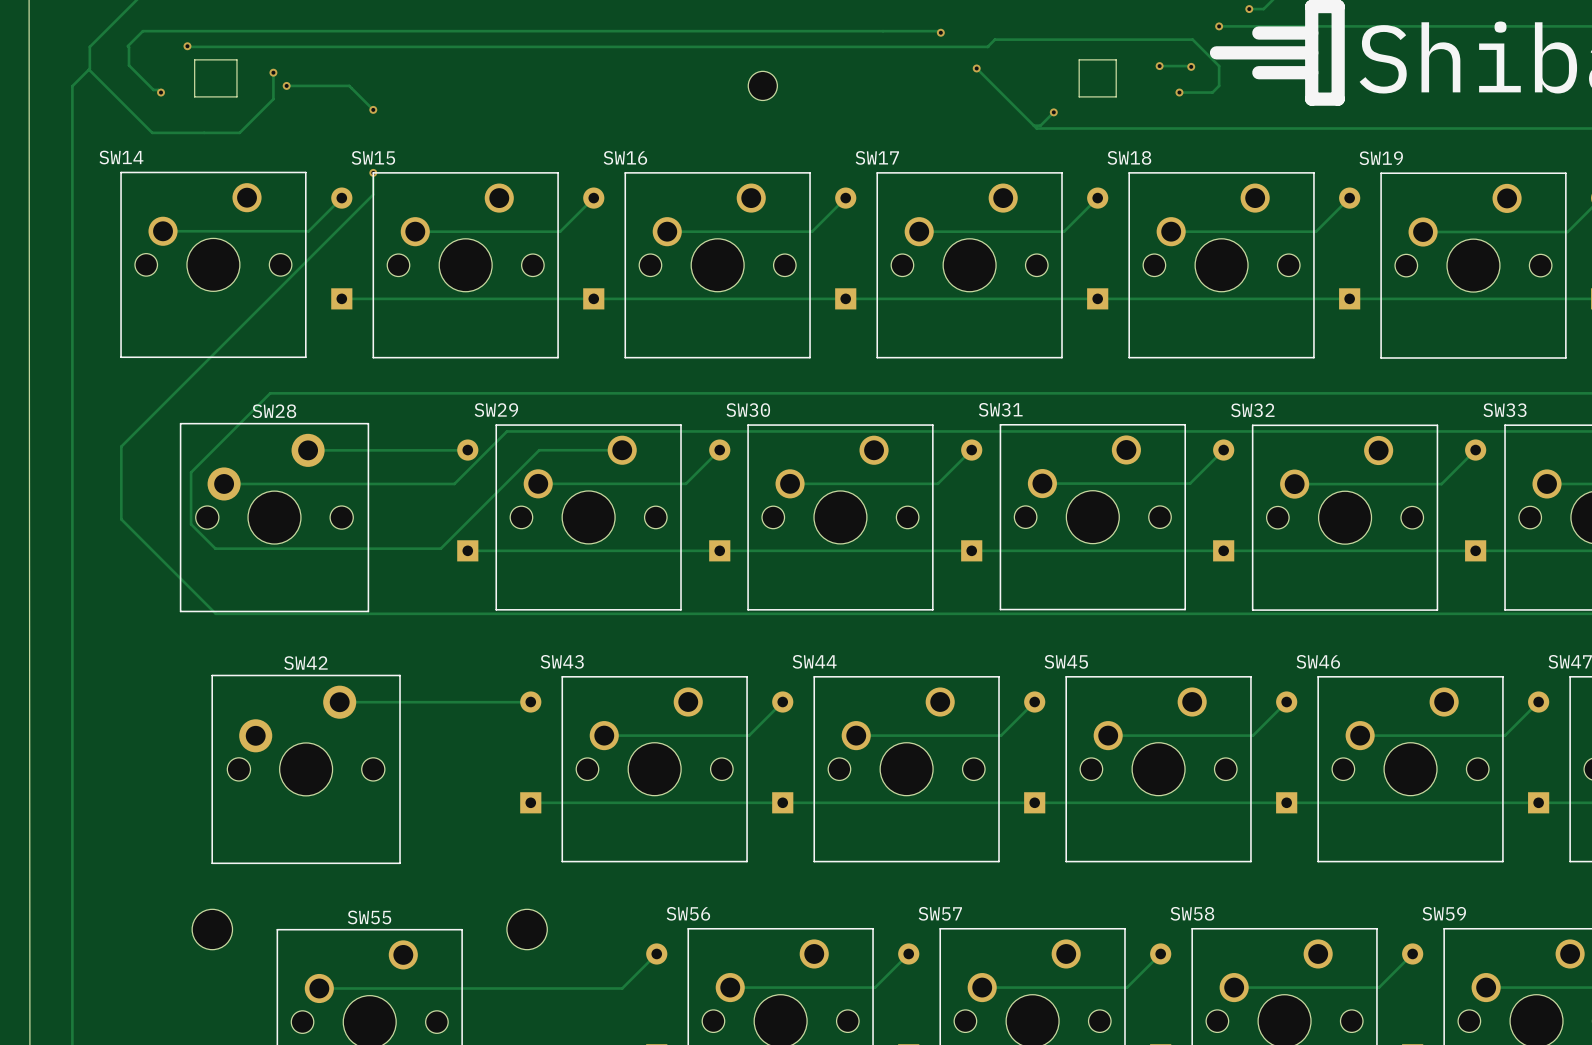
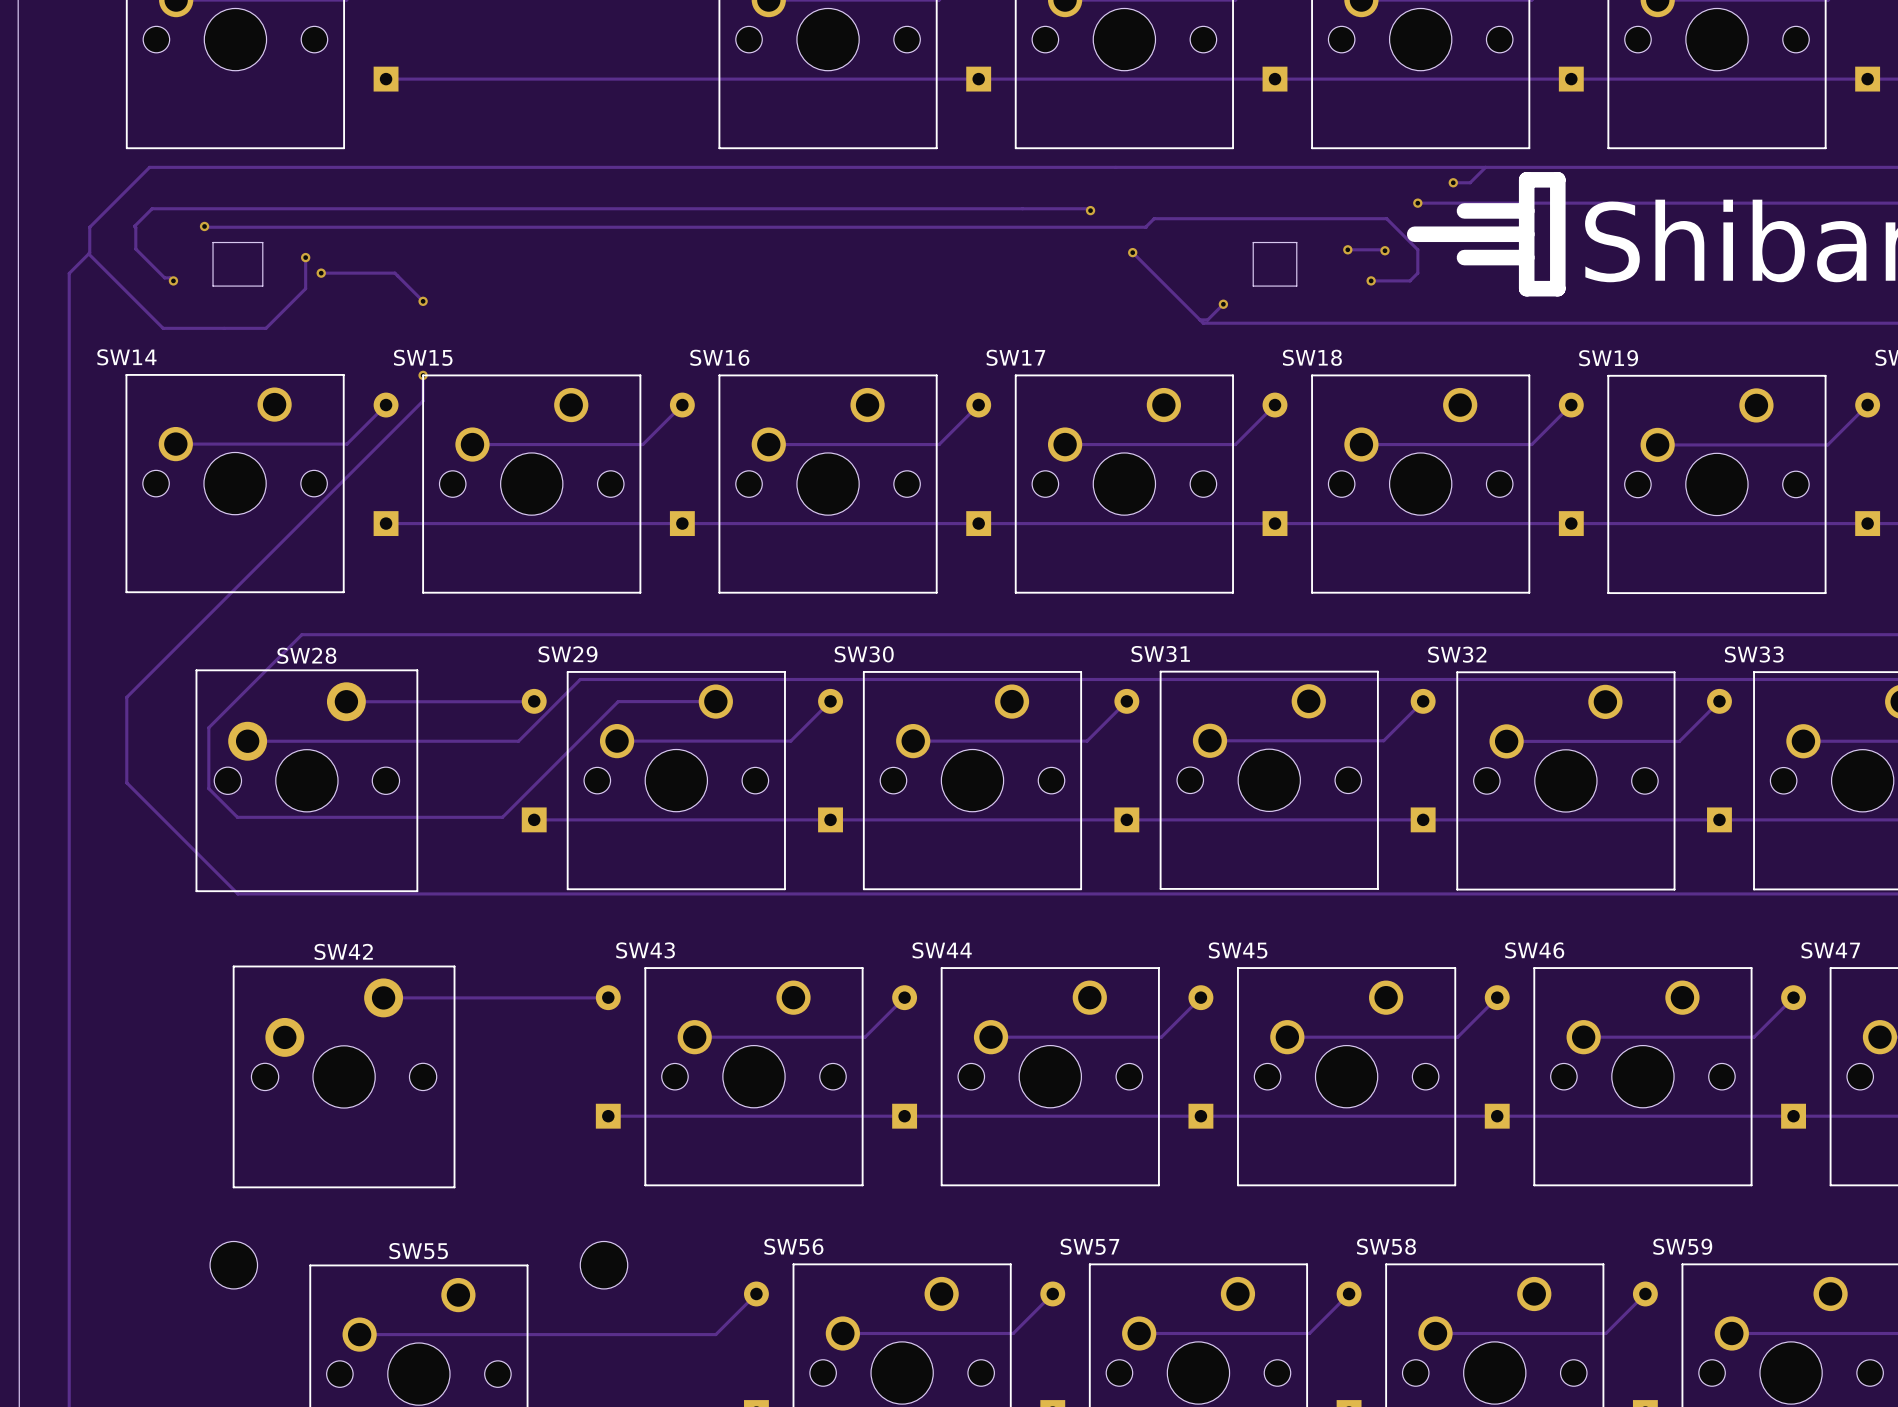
part: (762, 85) -> none

